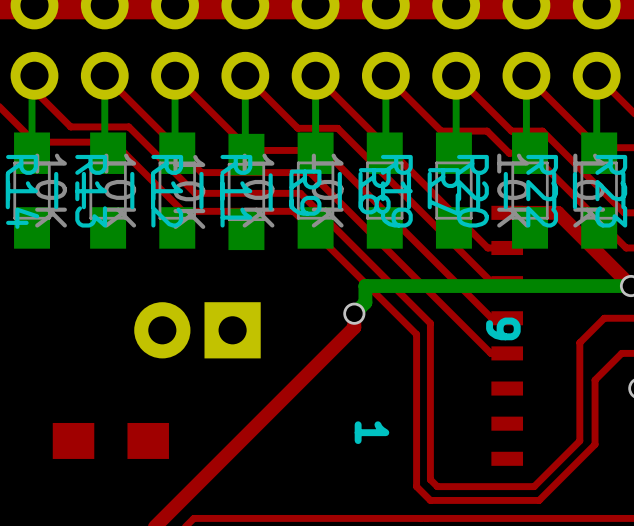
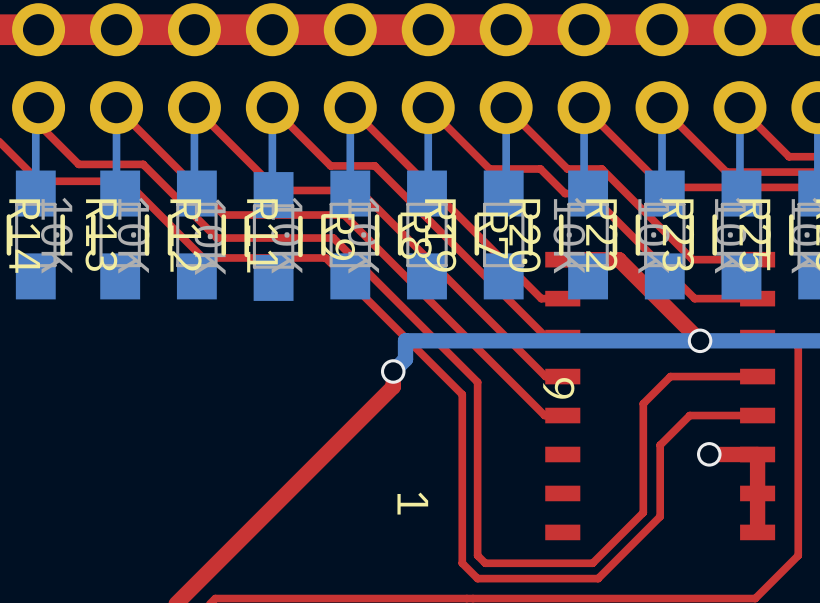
part: (197, 330) -> none
part: (110, 440) -> none

